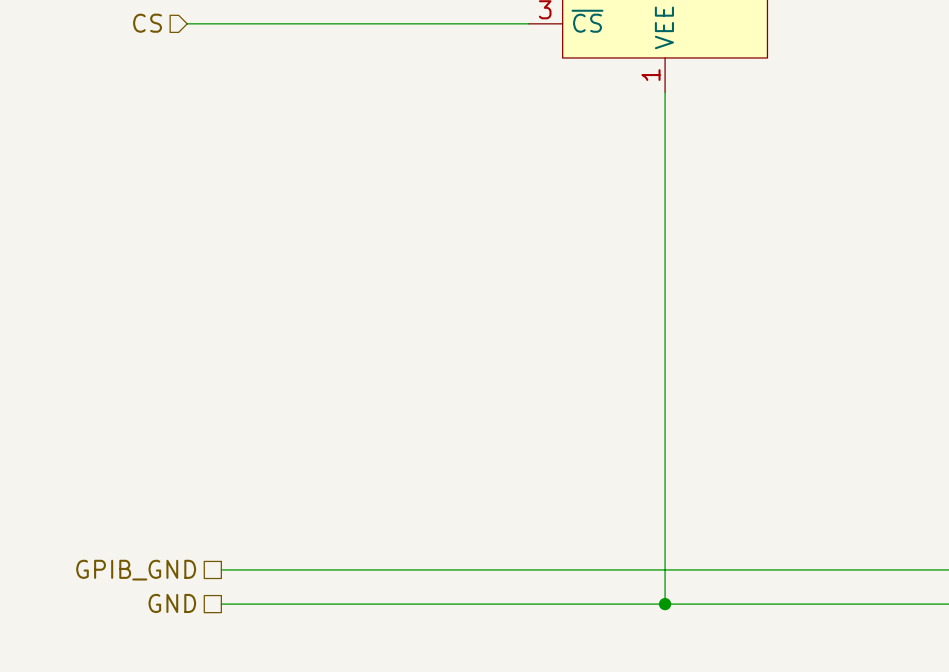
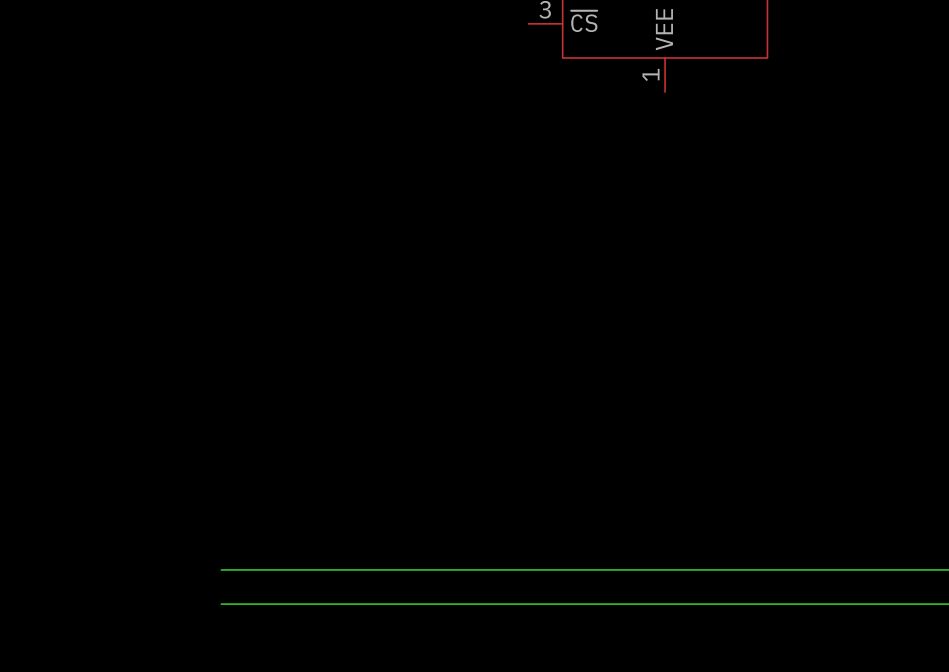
hierarchical label: CS (147, 23) -> none
wire: (187, 23) (528, 23) -> none
wire: (665, 92) (665, 604) -> none
hierarchical label: GPIB_GND (136, 570) -> none
hierarchical label: GND (172, 603) -> none
junction: (665, 604) -> none

